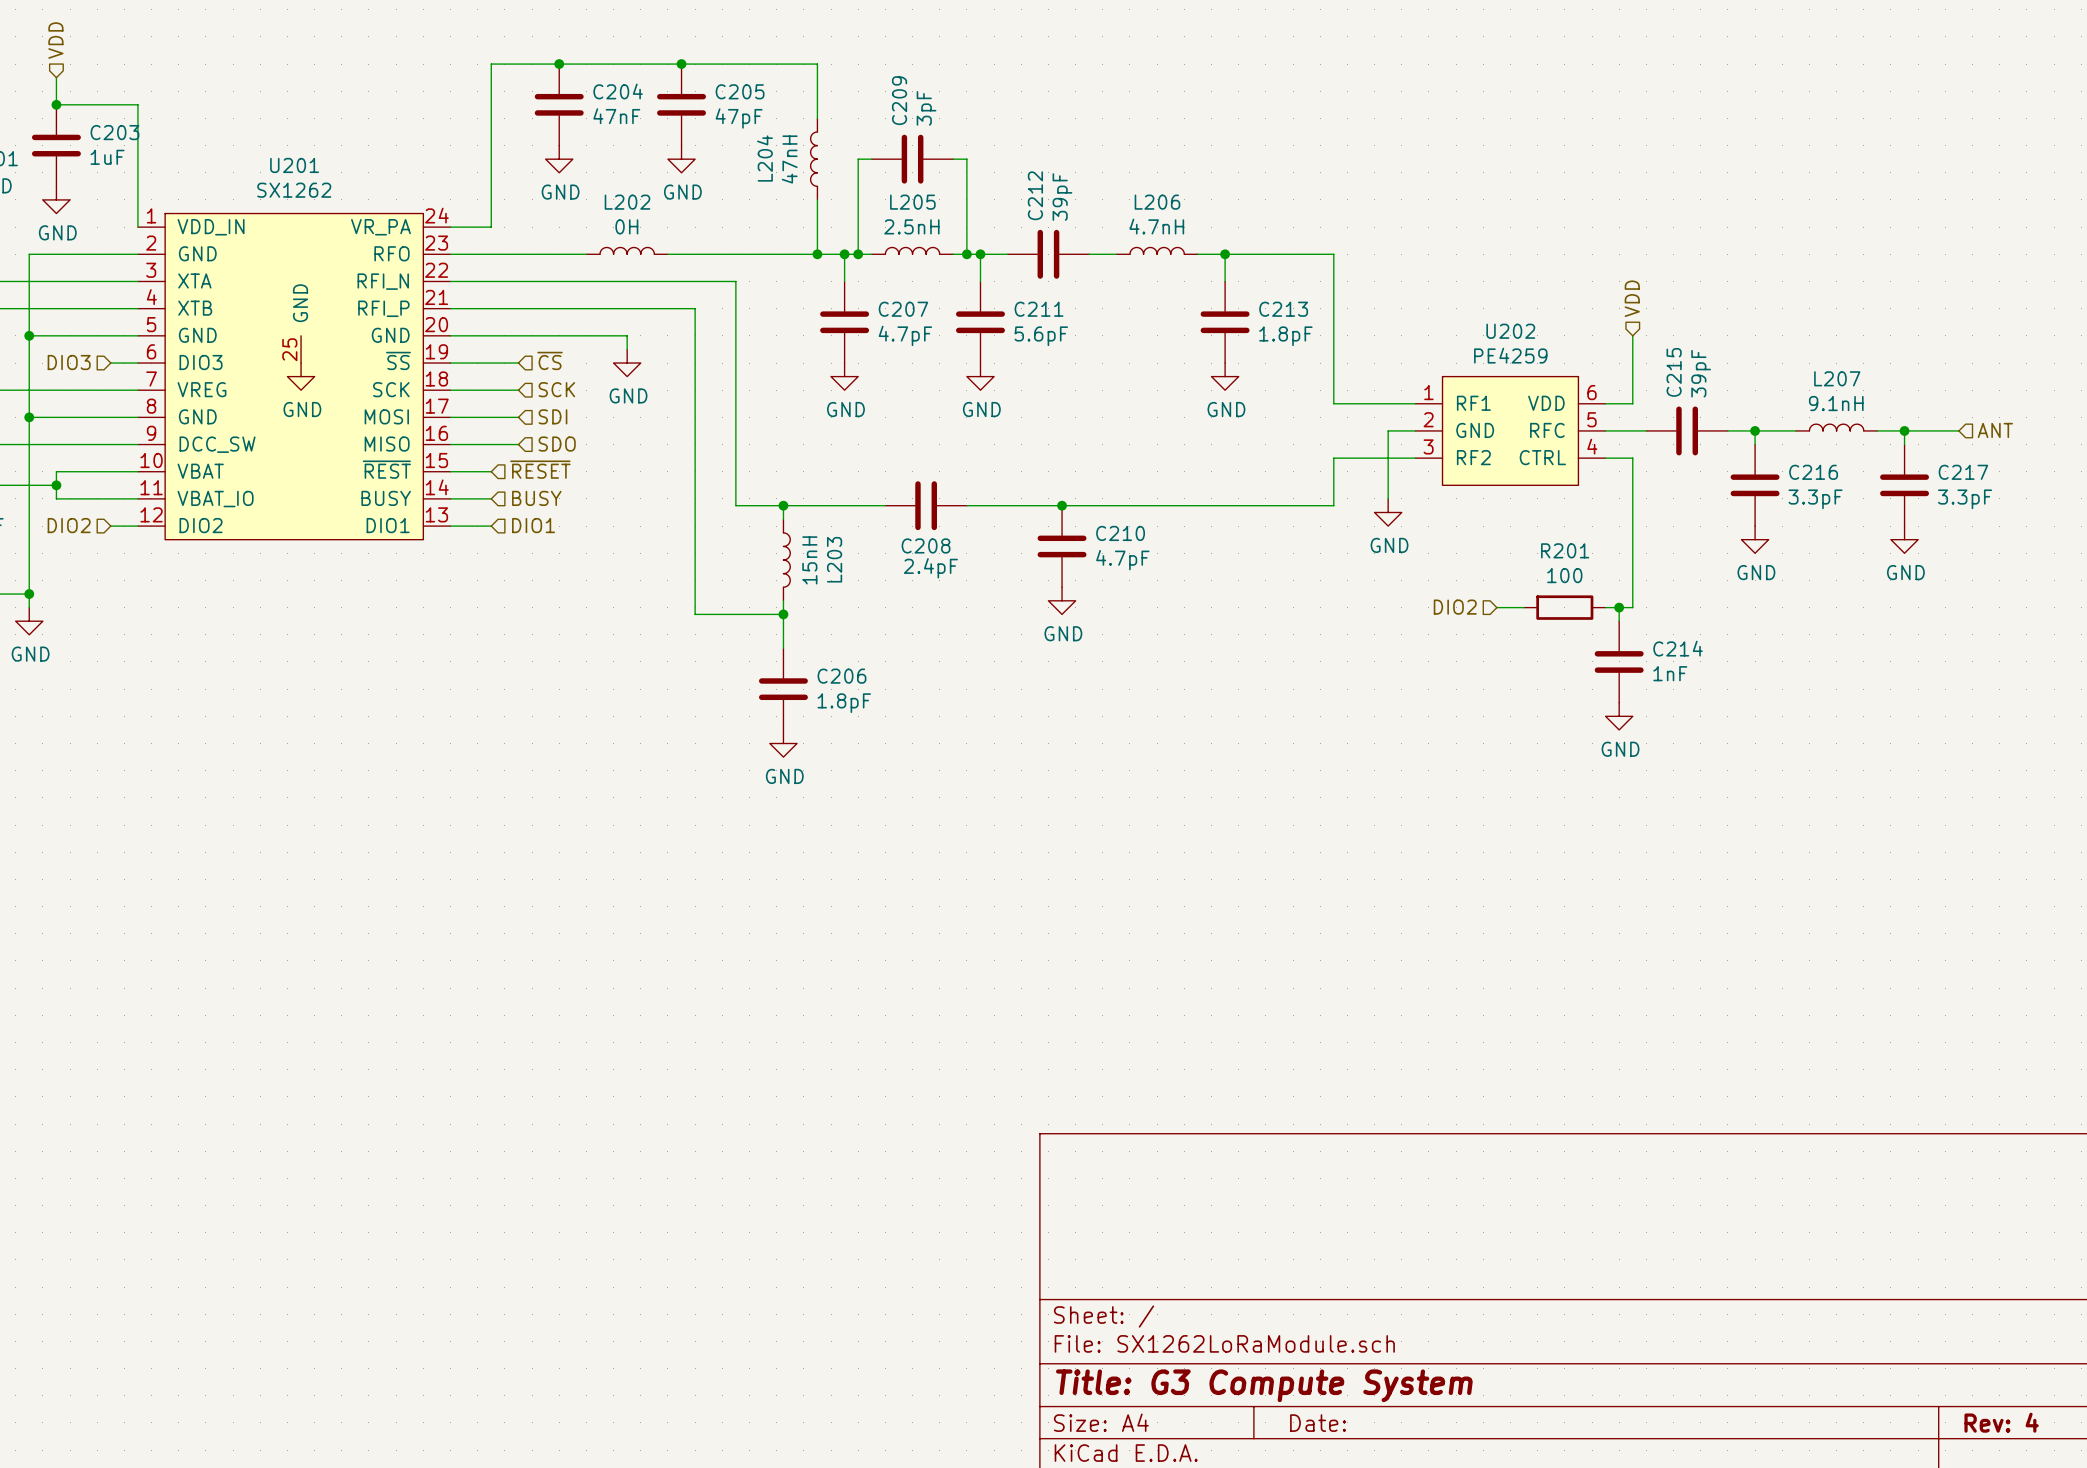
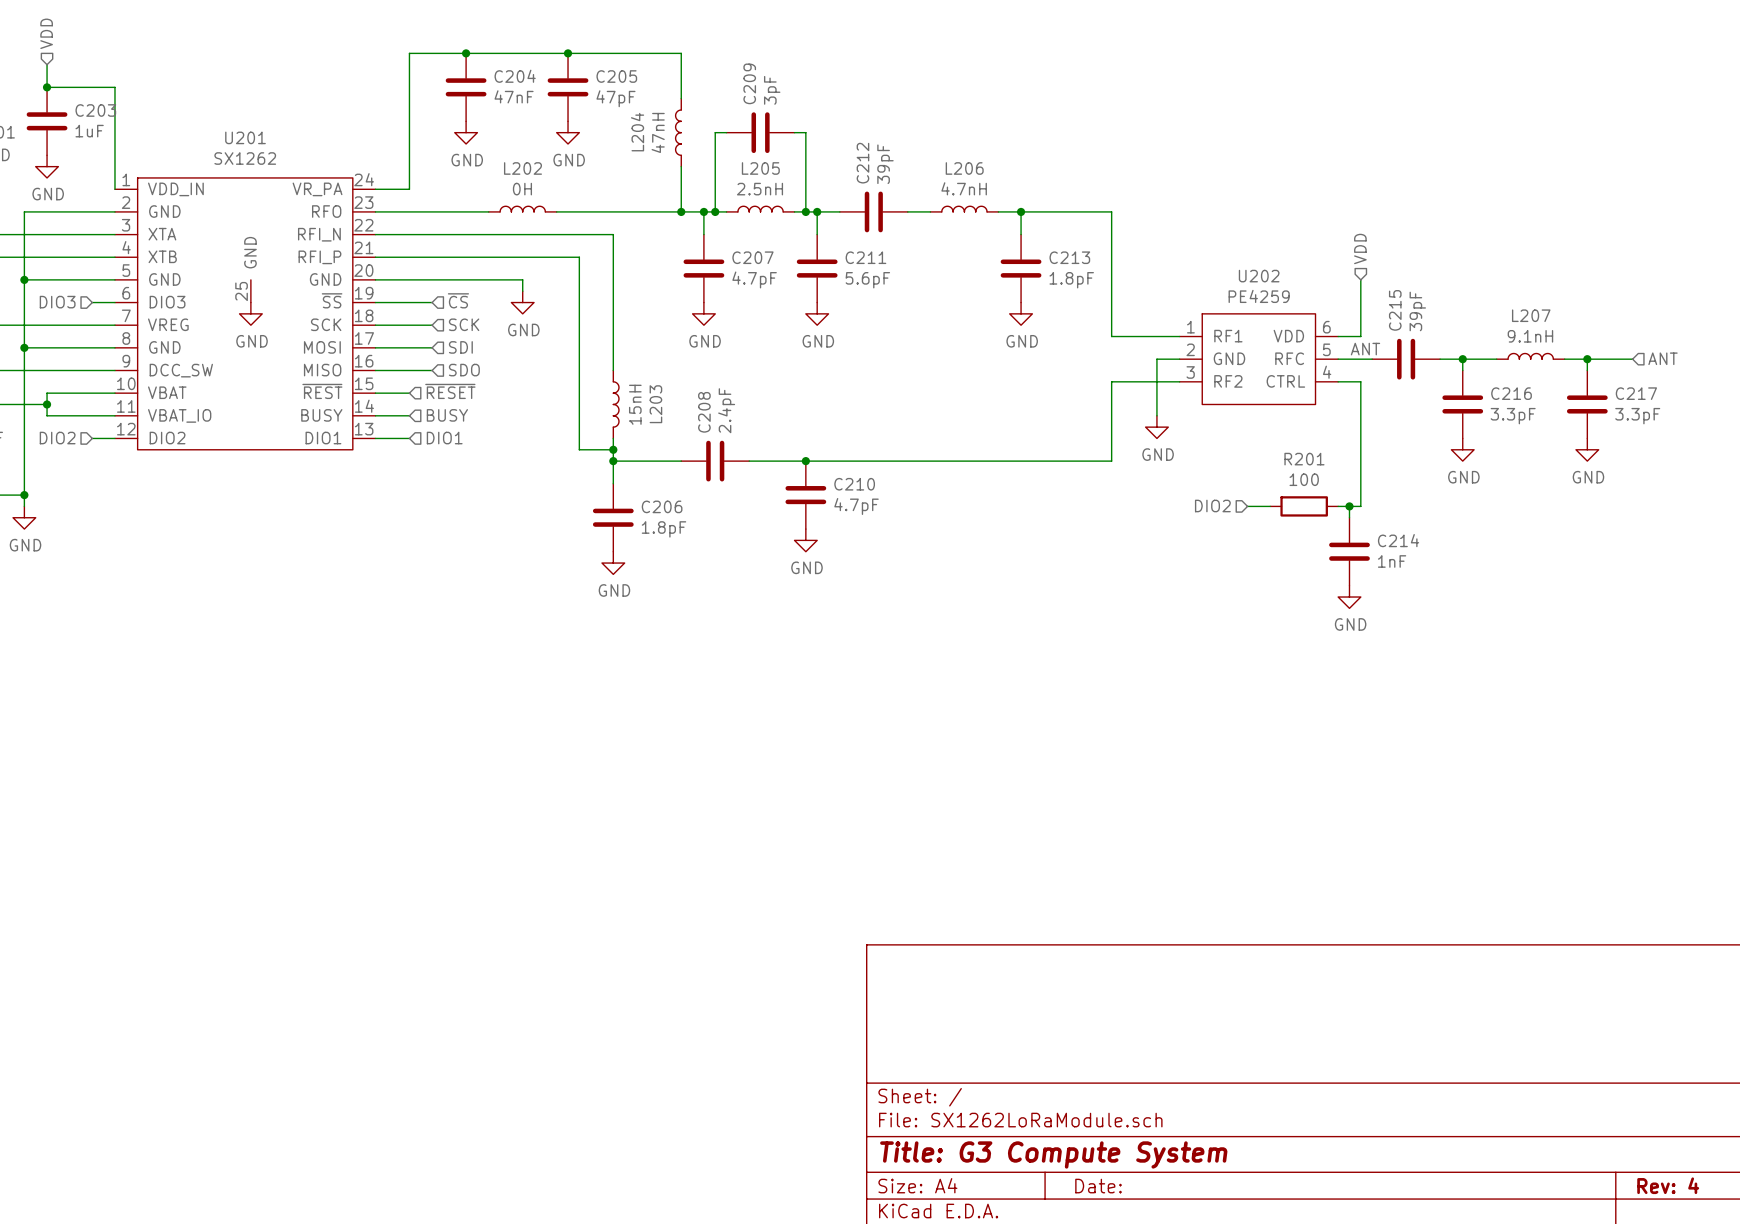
label: none -> ANT (1365, 349)
wire: (735, 444) (735, 505) (885, 505) -> none
wire: (783, 505) (783, 519) -> none
junction: (783, 505) -> none
C208 position: (926, 505) -> (715, 461)
wire: (966, 505) (1333, 505) -> (749, 461) (1111, 461) (1111, 421)
junction: (1062, 505) -> none
wire: none -> (613, 438) (613, 483)
wire: (695, 539) (695, 614) (783, 614) -> (579, 449) (613, 449)
junction: none -> (613, 449)
C208 name rotation: 0° (926, 545) -> 90° counterclockwise (704, 412)
C208 name position: C208 (926, 545) -> C208 (704, 412)
C210 position: (1062, 546) -> (805, 495)
wire: none -> (613, 461) (681, 461)
junction: none -> (613, 461)
junction: none -> (805, 461)
L203 position: (786, 560) -> (616, 404)
C208 value rotation: 0° (930, 568) -> 90° counterclockwise (726, 410)
C208 value position: 2.4pF (930, 568) -> 2.4pF (726, 410)
wire: (783, 600) (783, 648) -> none
power symbol: GND (1062, 600) -> none
junction: (783, 614) -> none
power symbol: none -> GND (805, 540)
C206 position: (783, 689) -> (613, 517)
power symbol position: GND (783, 743) -> GND (613, 563)

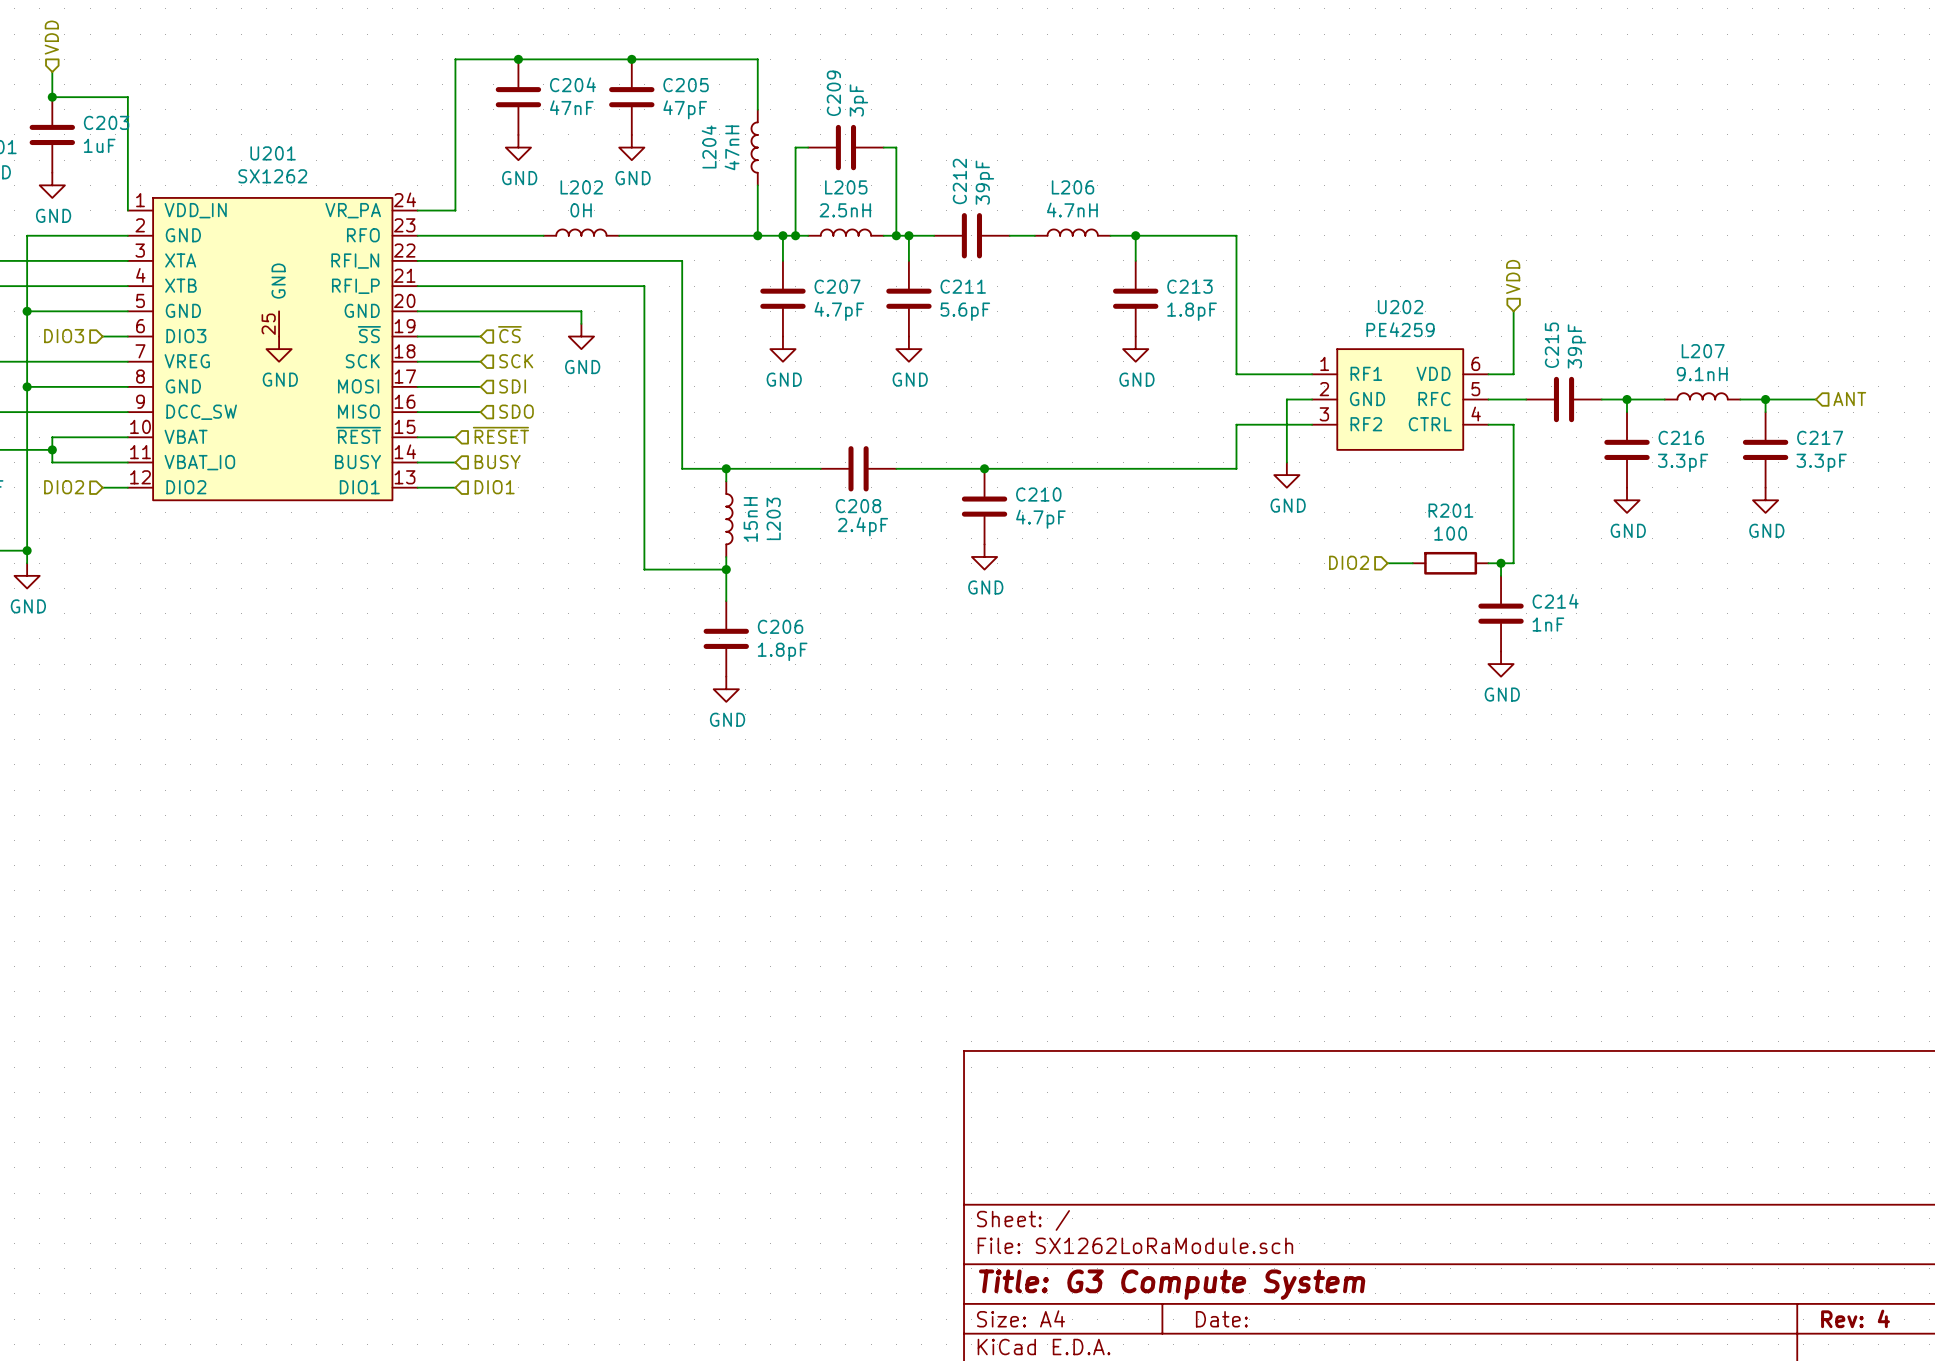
label: ANT (1365, 349) -> none
wire: none -> (682, 412) (682, 468) (820, 468)
L203 position: (616, 404) -> (729, 519)
C208 value rotation: 0° (726, 410) -> 90° clockwise (862, 526)
C208 value position: 2.4pF (726, 410) -> 2.4pF (862, 526)
C208 name rotation: 0° (704, 412) -> 90° clockwise (858, 506)
C208 name position: C208 (704, 412) -> C208 (858, 506)
wire: none -> (726, 468) (726, 481)
junction: none -> (726, 468)
junction: none -> (984, 468)
wire: (1111, 421) (1111, 461) (749, 461) -> (1236, 468) (896, 468)
wire: (613, 438) (613, 483) -> none
wire: (579, 449) (613, 449) -> (644, 500) (644, 569) (726, 569)
junction: (613, 449) -> none
wire: (613, 461) (681, 461) -> none
junction: (613, 461) -> none
C208 position: (715, 461) -> (858, 468)
junction: (805, 461) -> none
C210 position: (805, 495) -> (984, 506)
wire: none -> (726, 556) (726, 601)
power symbol: none -> GND (984, 556)
junction: none -> (726, 569)
C206 position: (613, 517) -> (726, 638)
power symbol: GND (805, 540) -> none
power symbol position: GND (613, 563) -> GND (726, 689)

